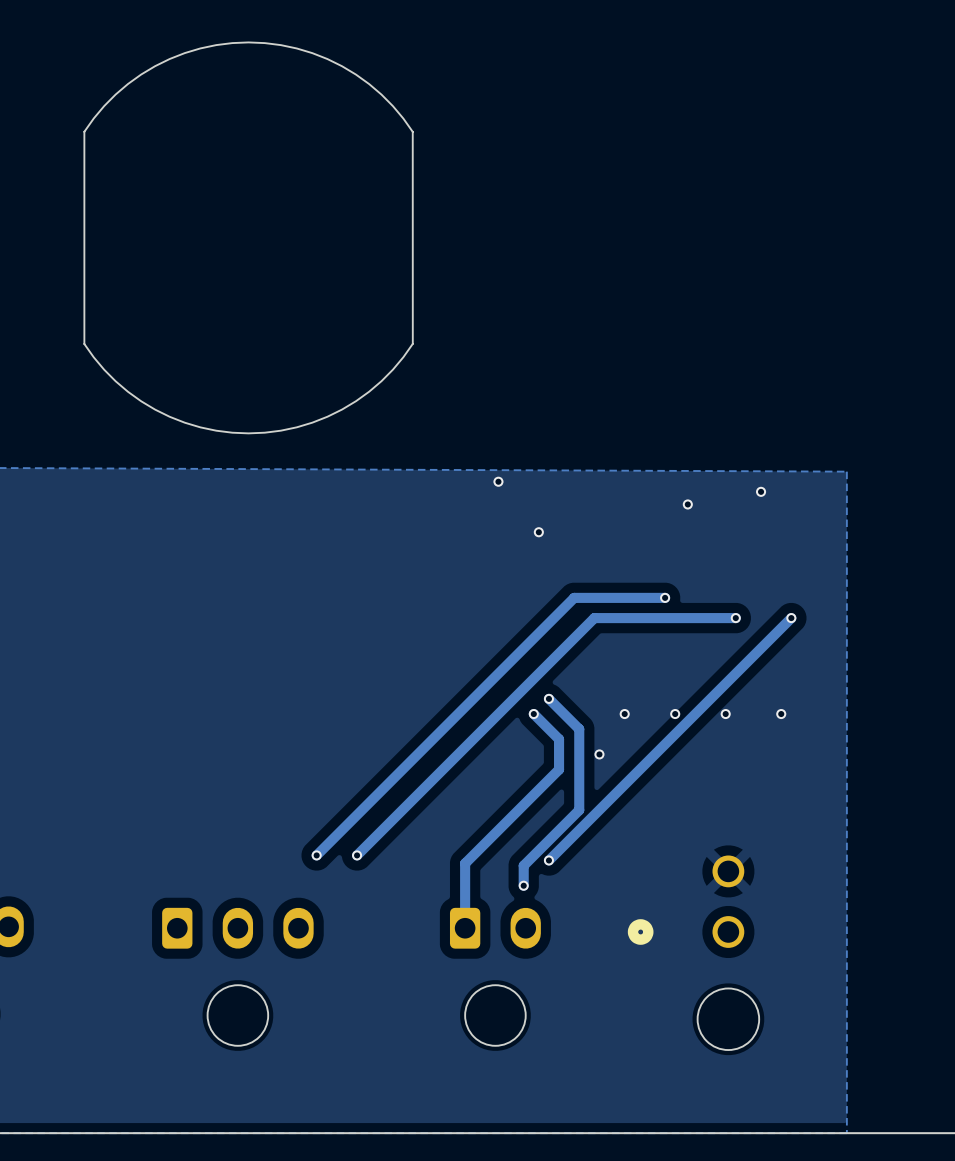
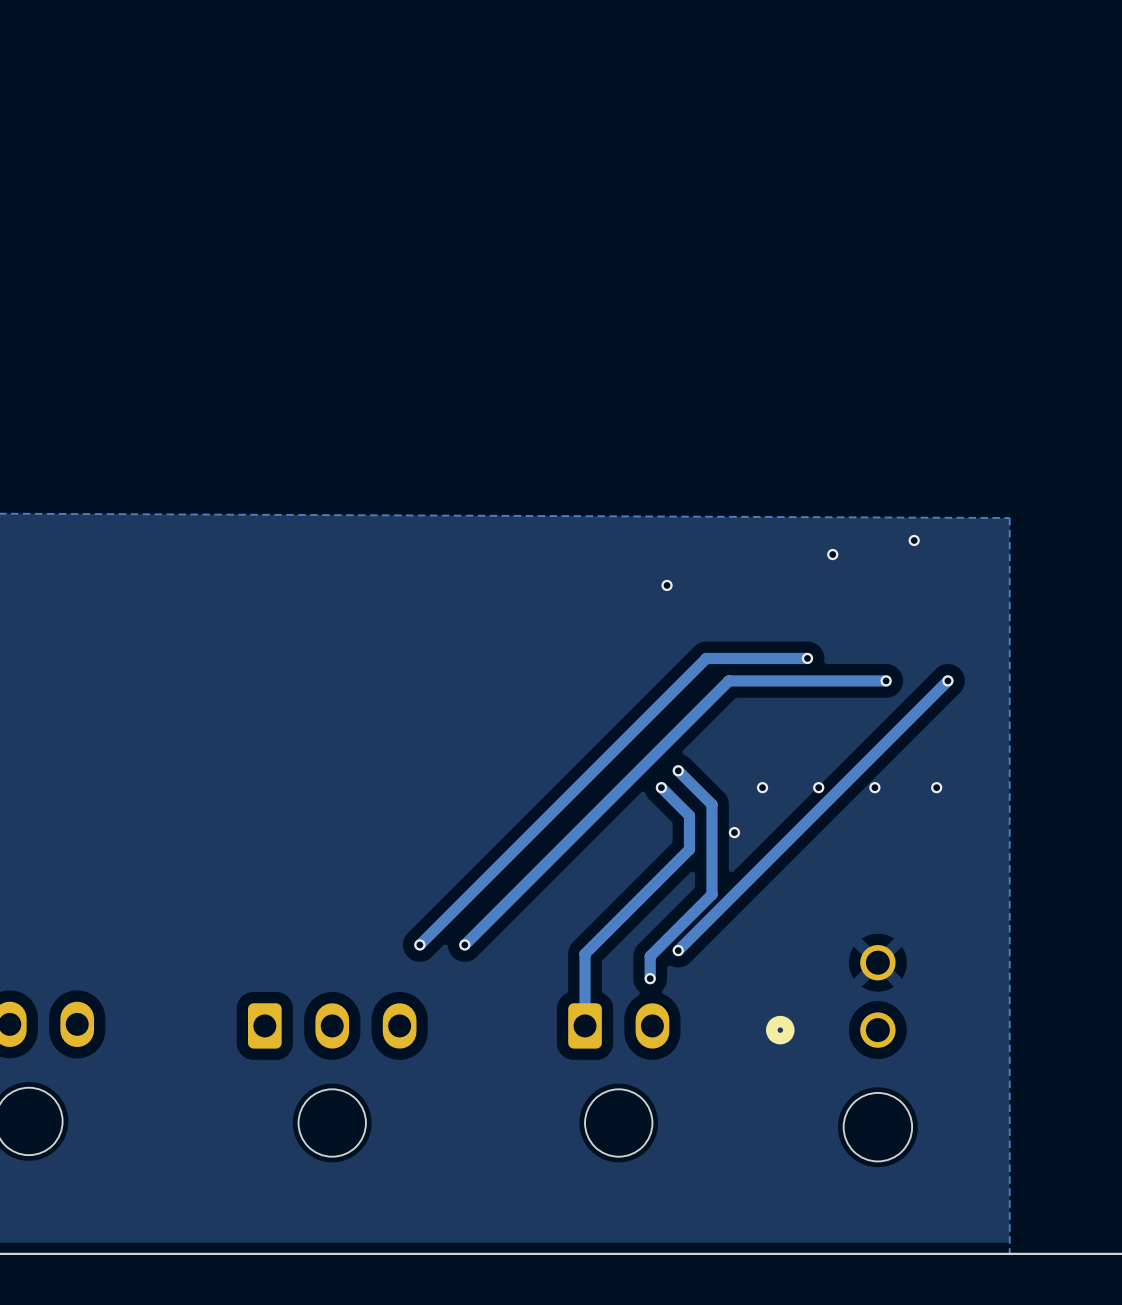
board edge: (84, 131) (84, 344) (115, 381) (141, 401) (169, 416) (216, 430) (264, 432) (296, 427) (342, 409) (369, 391) (393, 369) (412, 343) (412, 131) (392, 106) (355, 74) (327, 59) (296, 48) (248, 42) (216, 45) (169, 59) (141, 74) (115, 94) (84, 131) -> none
via: (498, 481) -> none

